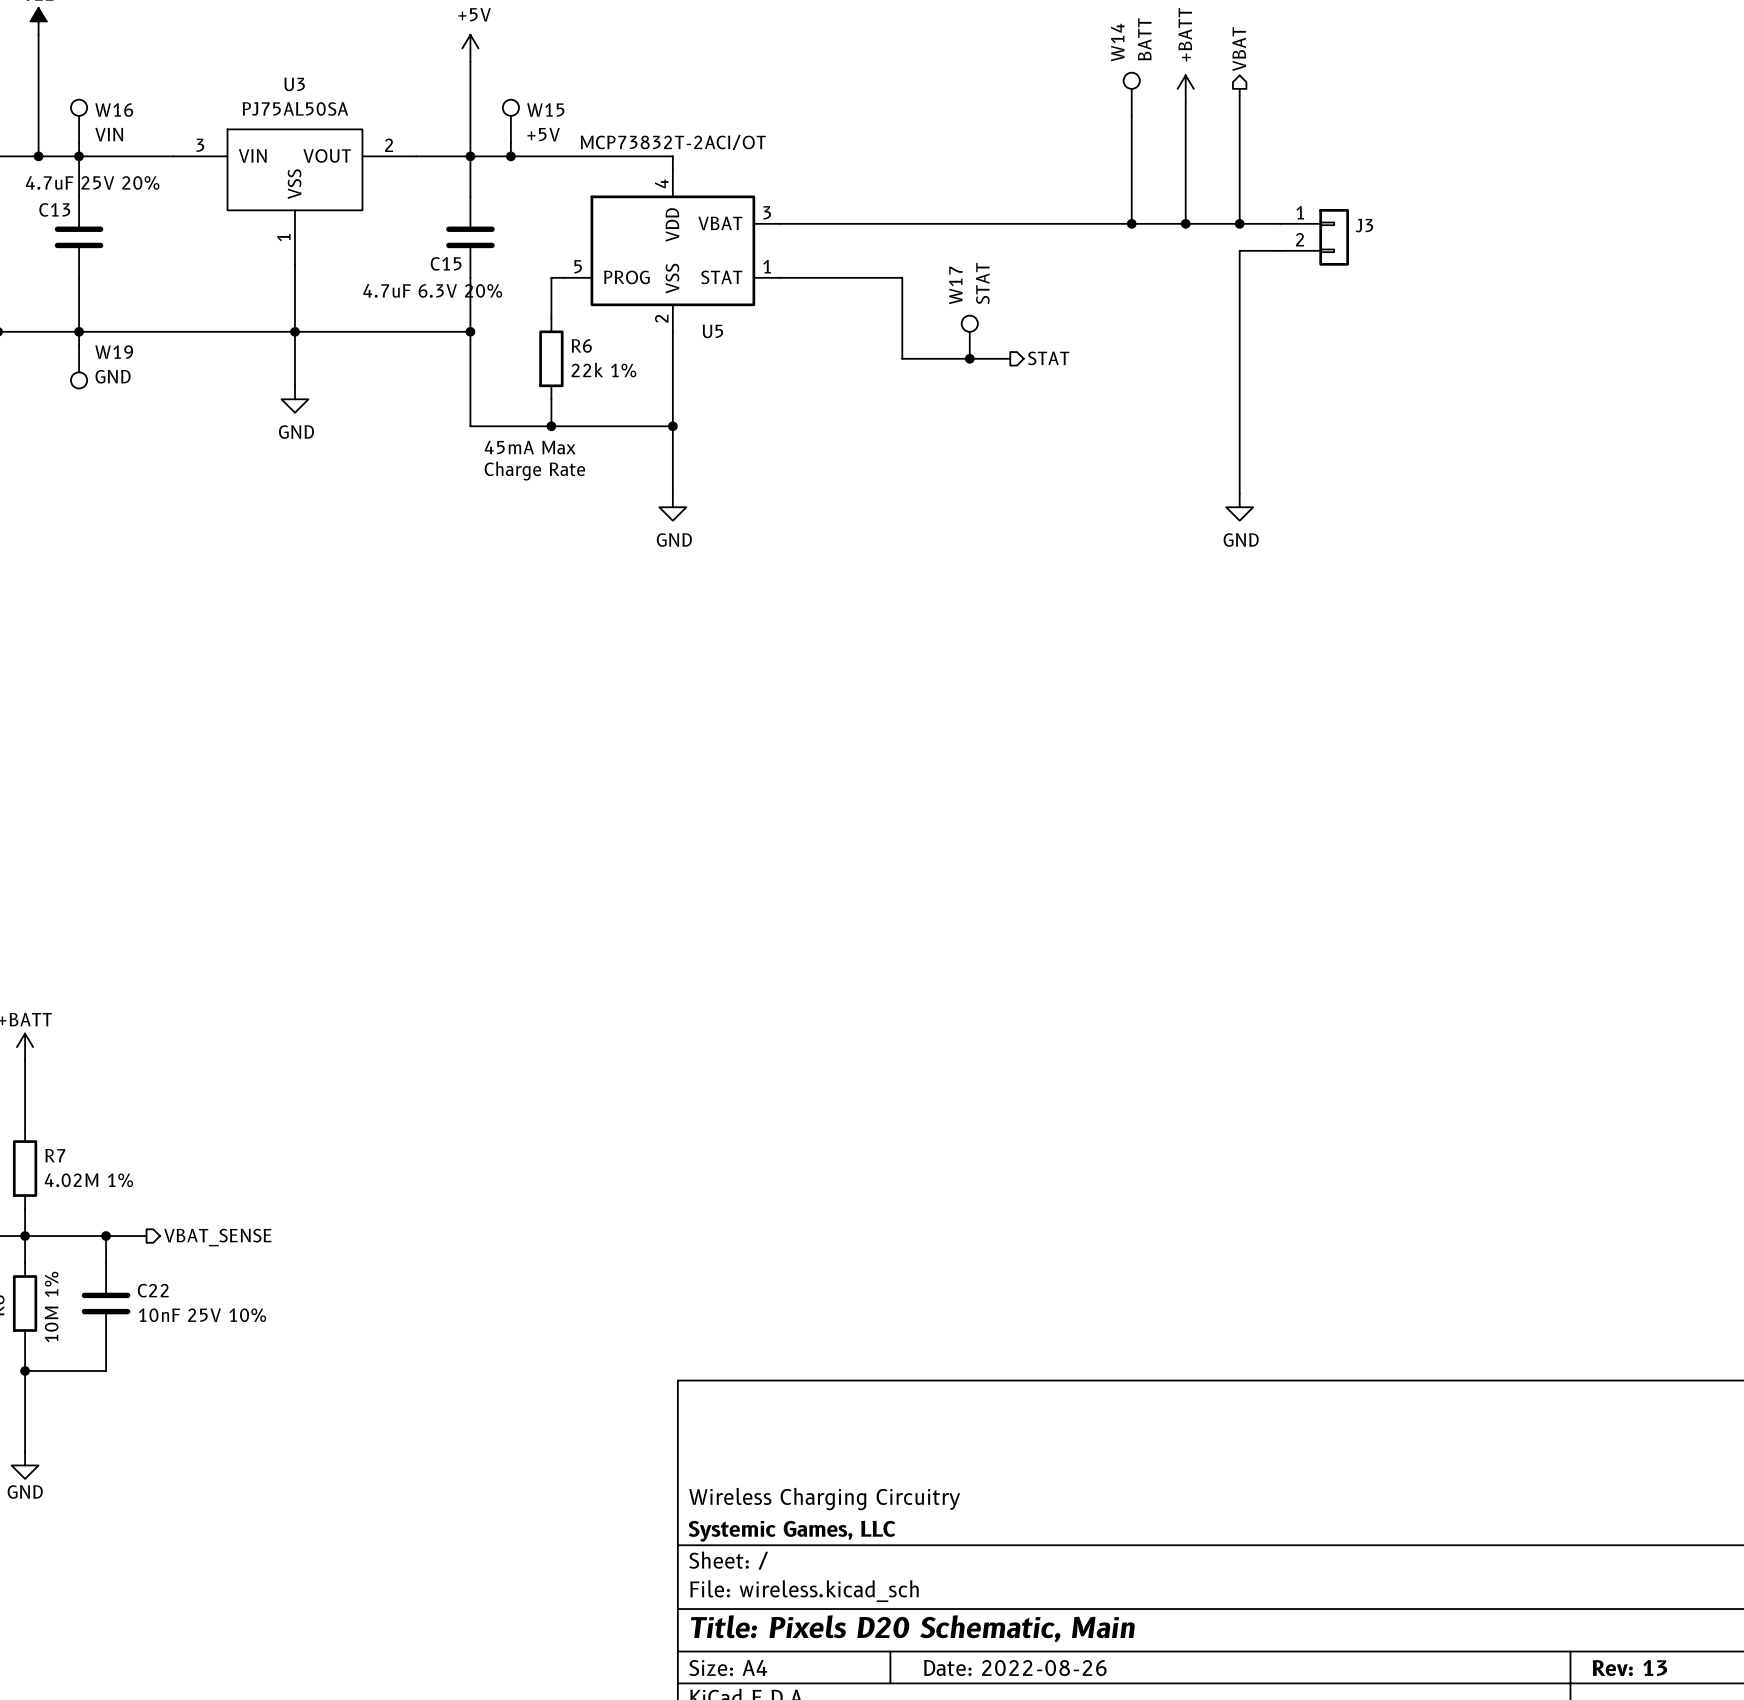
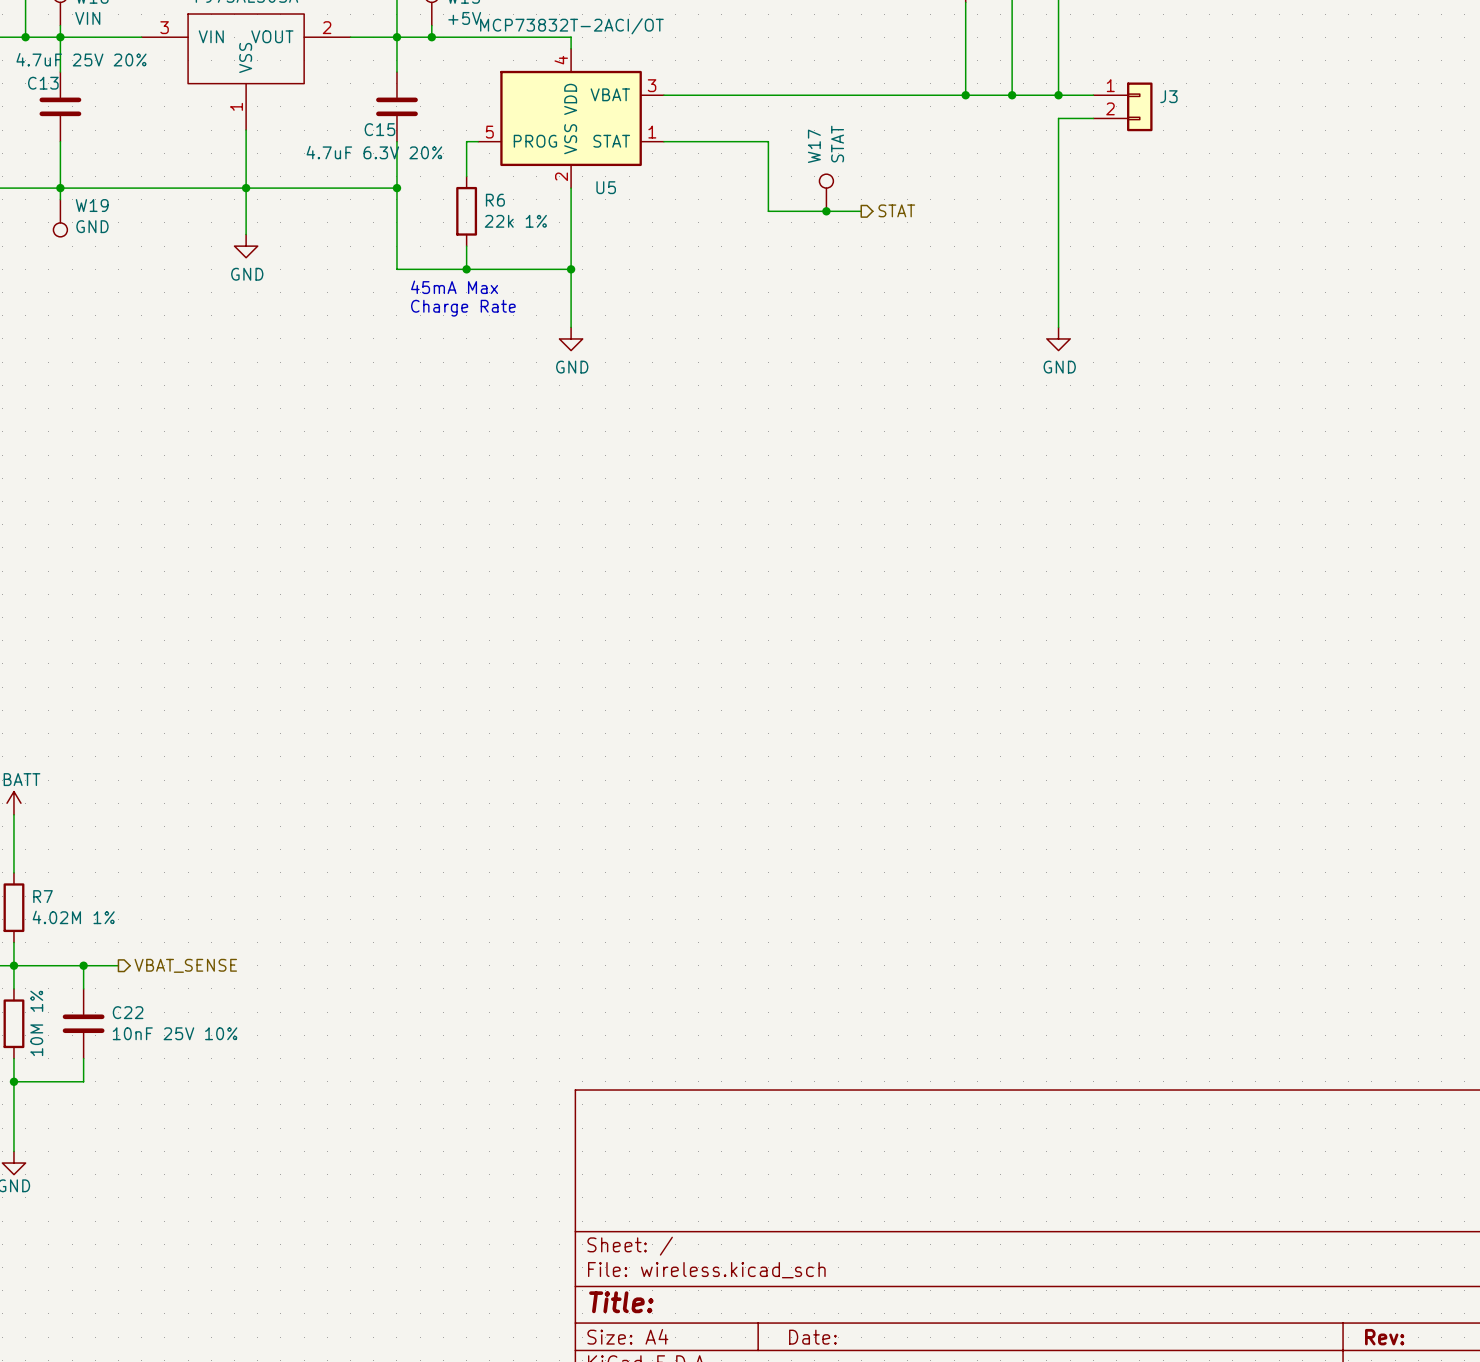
title block: Wireless Charging Circuitry (824, 1499) -> none
title block: Systemic Games, LLC (792, 1531) -> none
title block: Title: Pixels D20 Schematic, Main (912, 1628) -> Title: (621, 1302)
title block: Date: 2022-08-26 (1015, 1668) -> Date: (812, 1337)
title block: Rev: 13 (1629, 1668) -> Rev: (1384, 1337)

